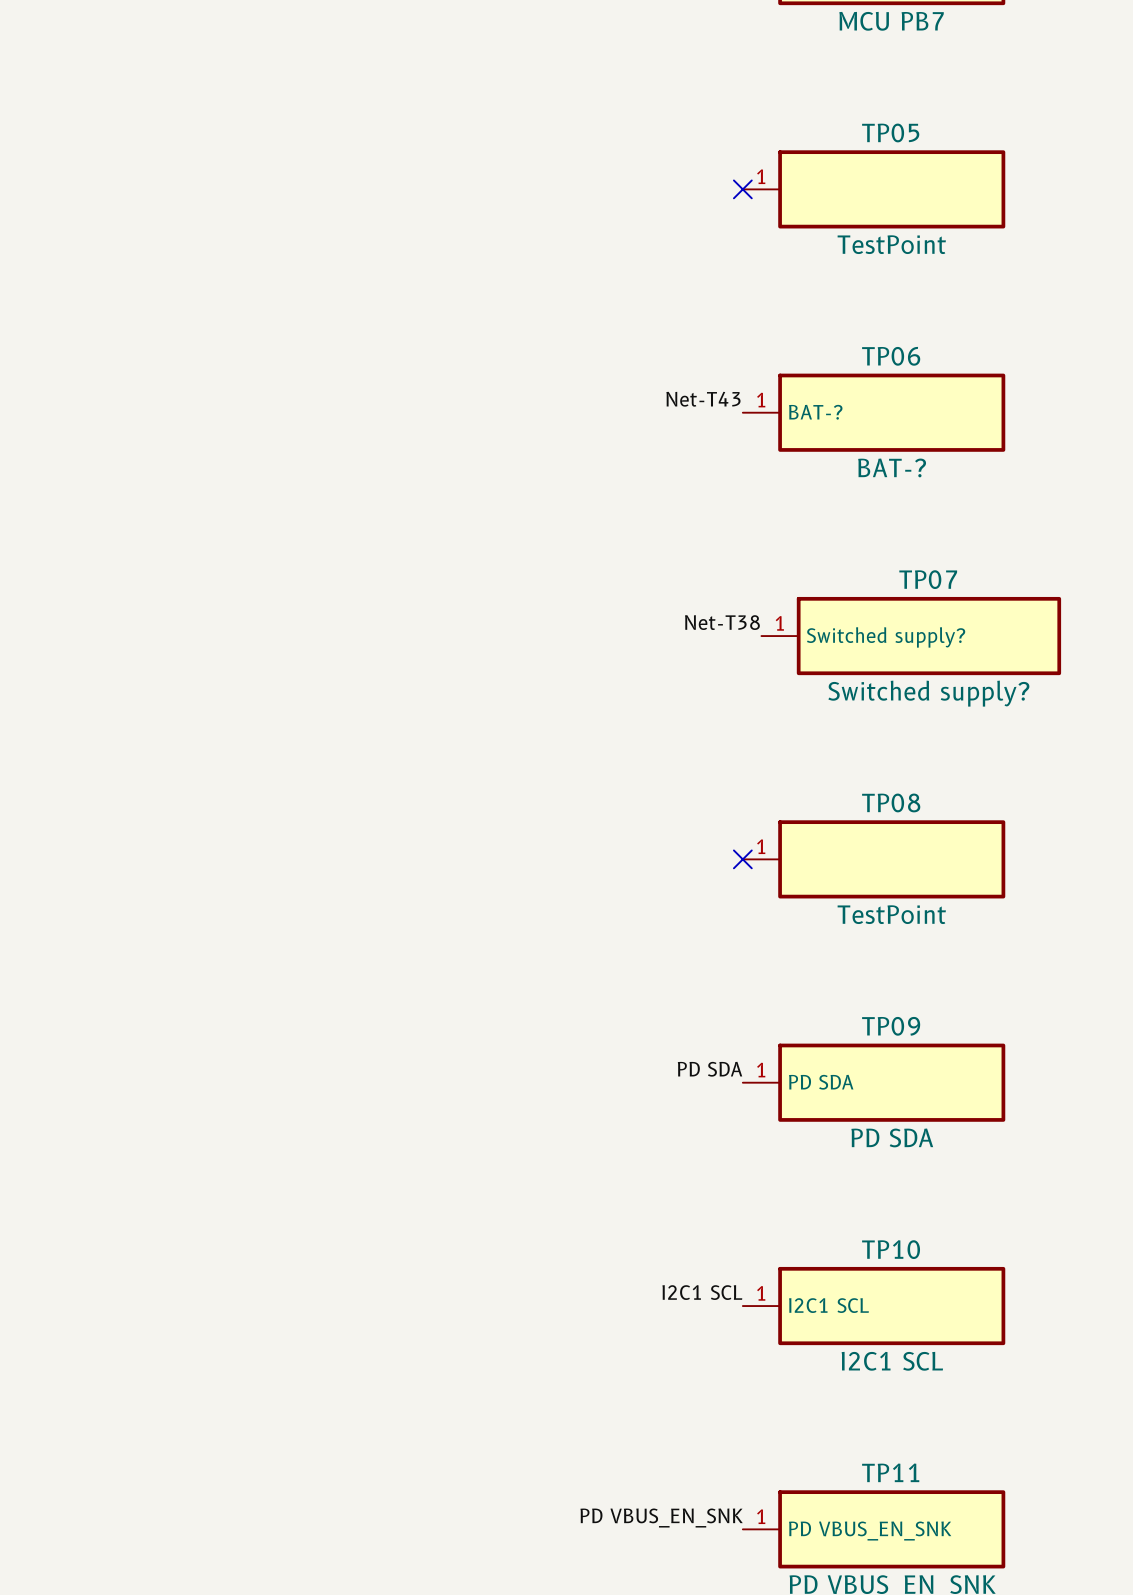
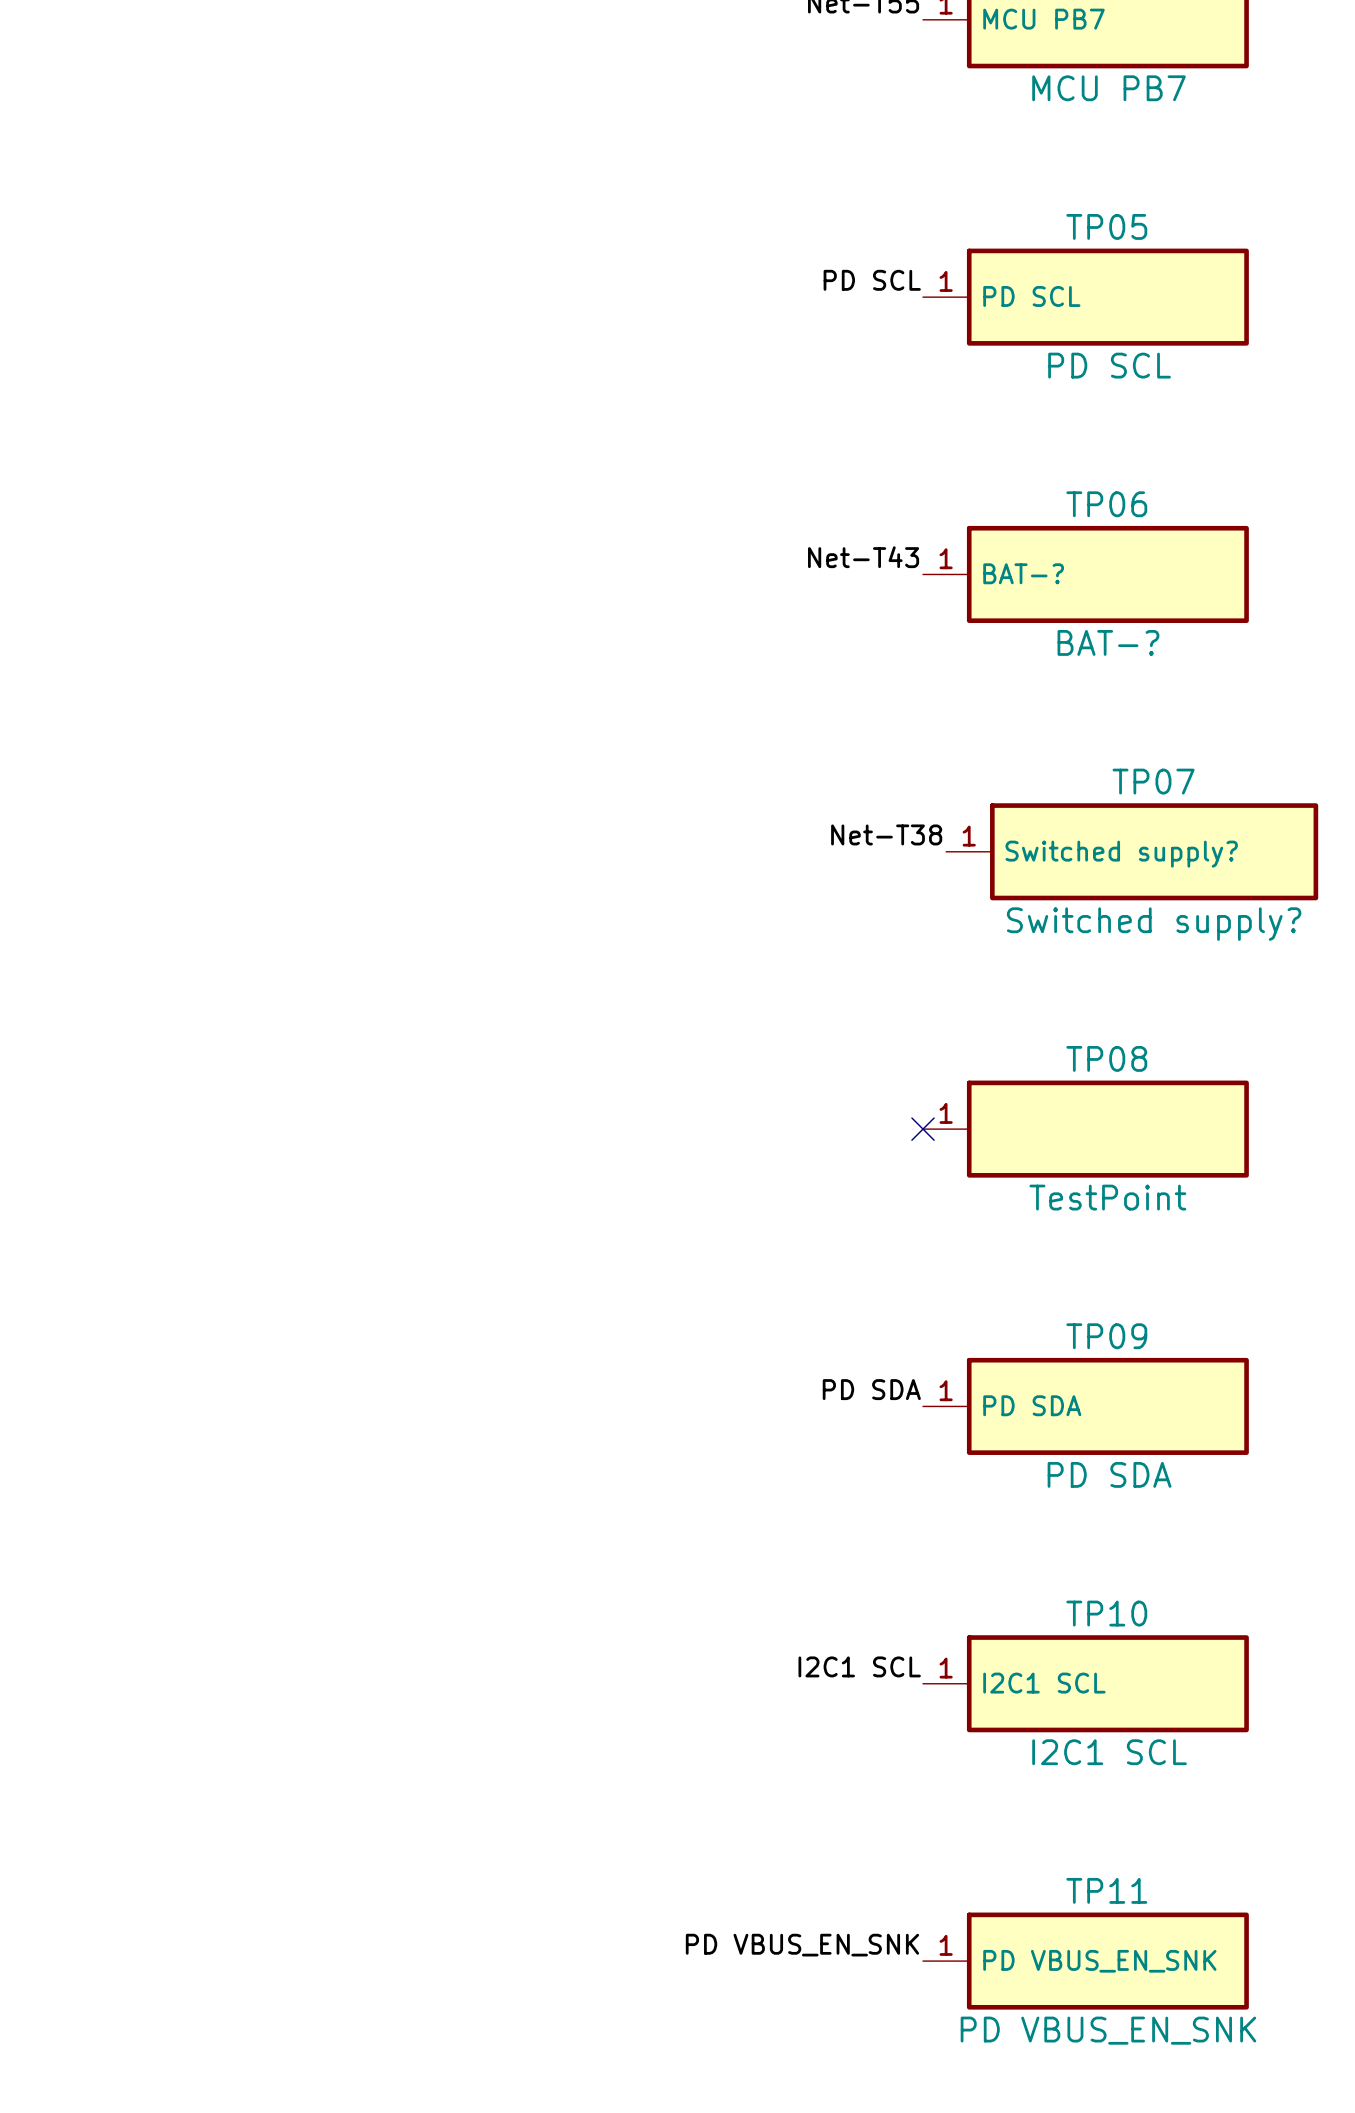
label: none -> PD SCL (872, 280)
TP05 pin name: none -> PD SCL (1031, 296)
no-connect mark: (742, 189) -> none
TP05 value: TestPoint (891, 244) -> PD SCL (1109, 365)

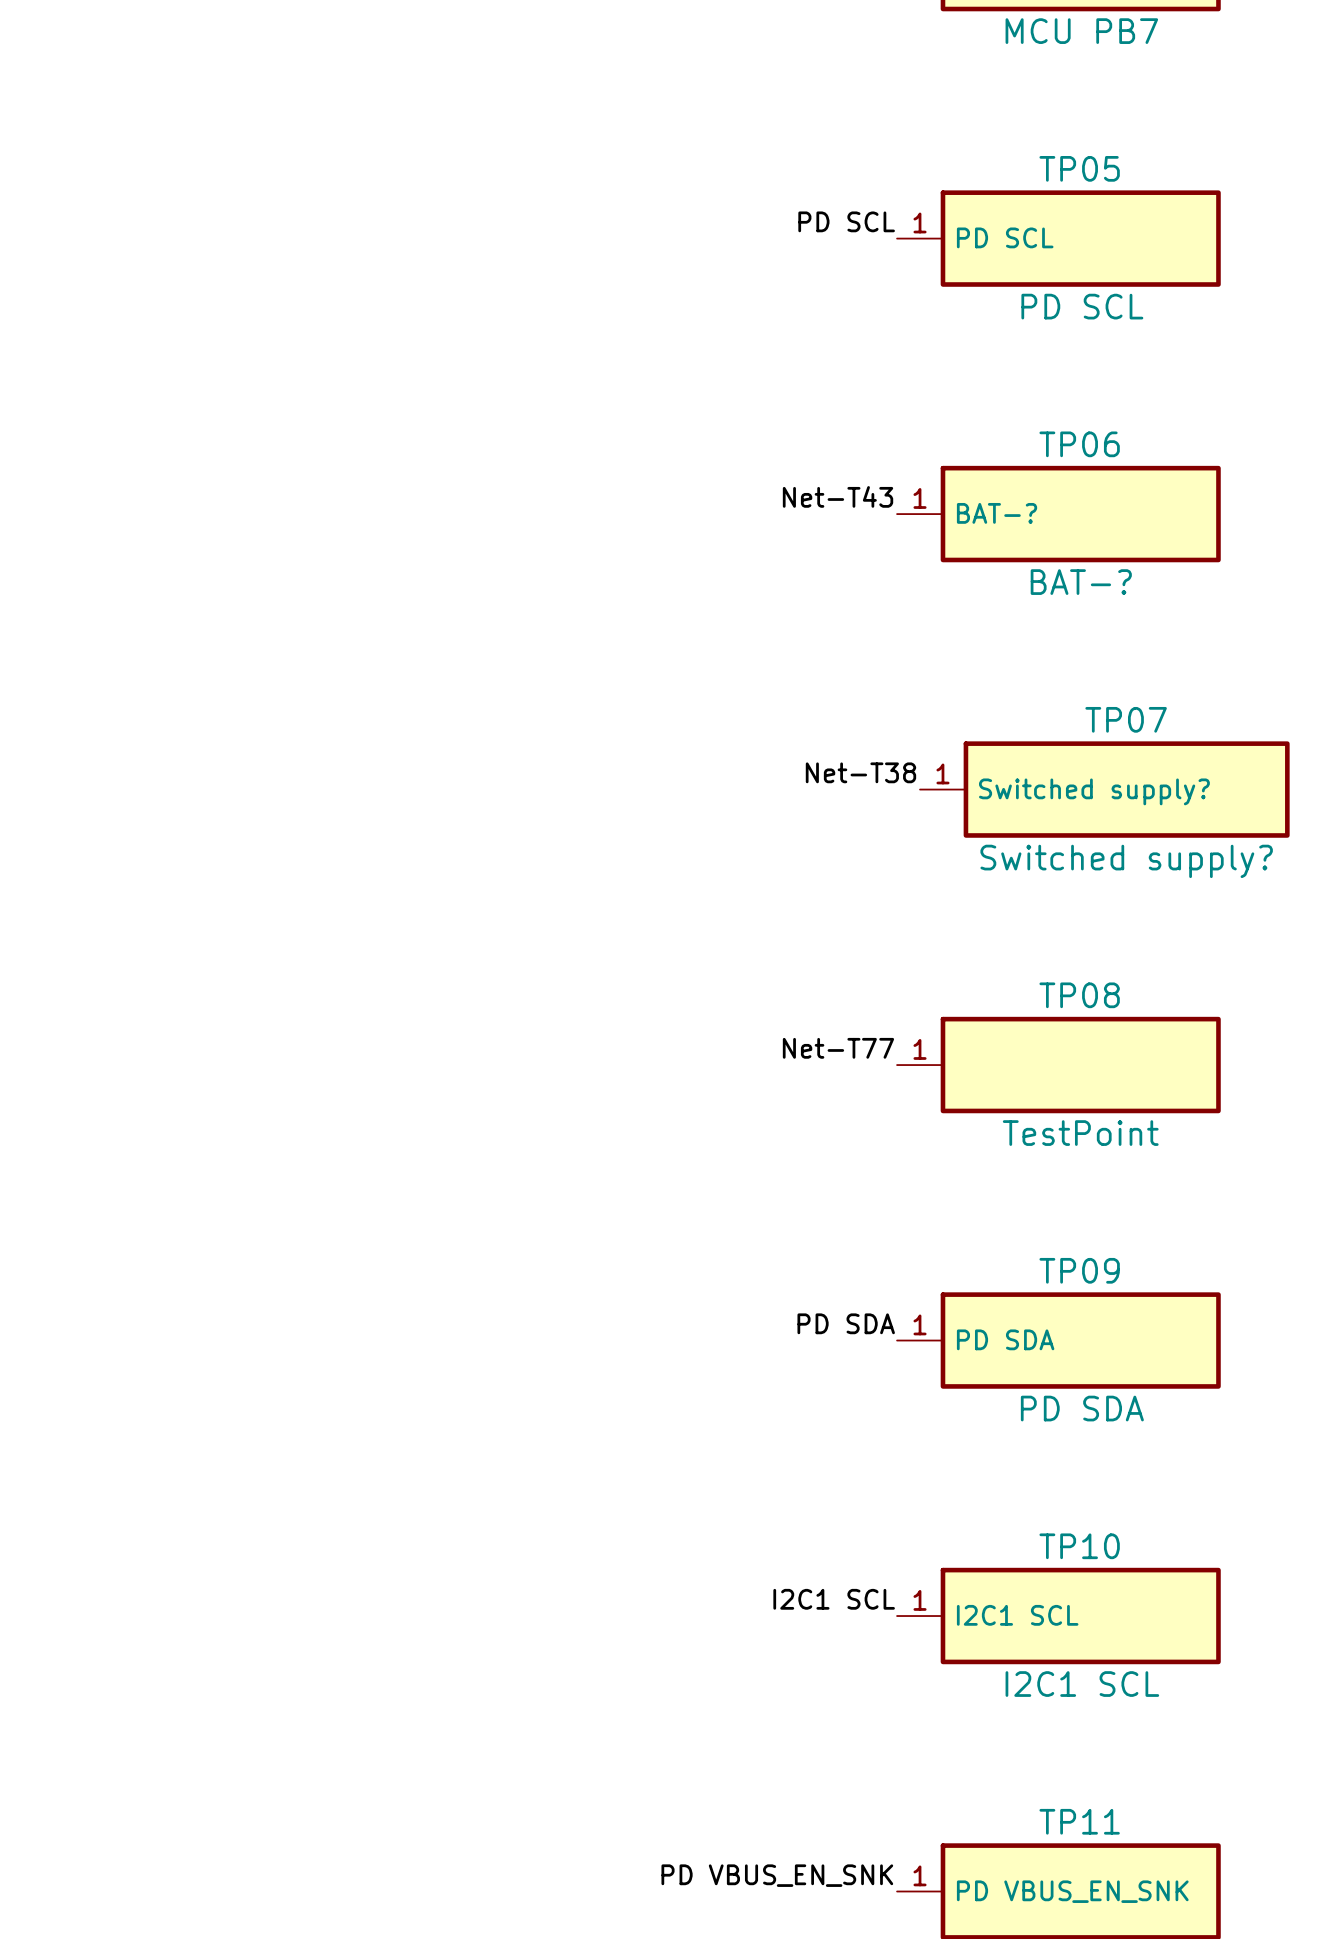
label: none -> Net-T77 (838, 1048)
no-connect mark: (923, 1129) -> none

